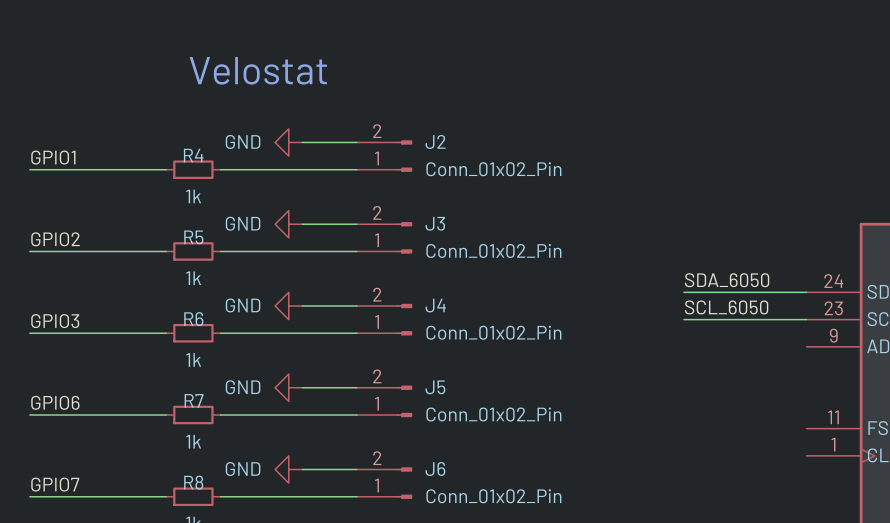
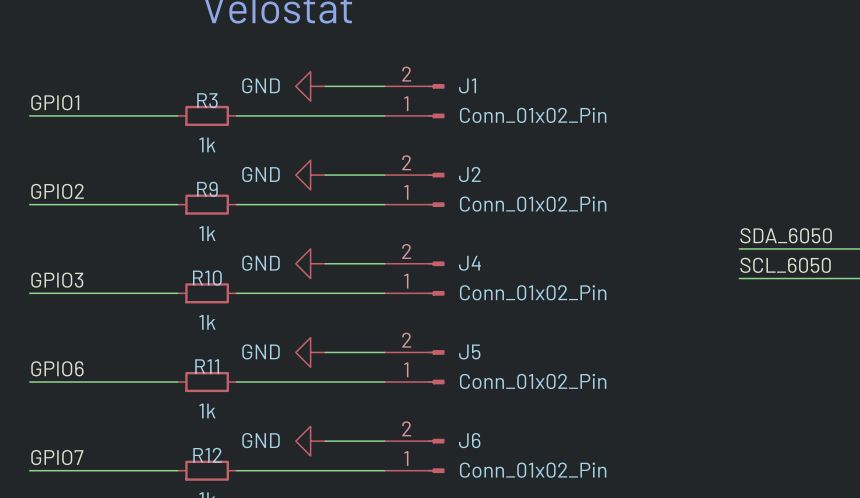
J2 name: J2 (435, 141) -> J1 (467, 85)
R4 name: R4 (193, 155) -> R3 (207, 100)
J3 name: J3 (435, 223) -> J2 (469, 174)
R5 name: R5 (193, 237) -> R9 (207, 189)
R6 name: R6 (193, 319) -> R10 (207, 277)
R7 name: R7 (194, 400) -> R11 (207, 366)
R8 name: R8 (193, 482) -> R12 (207, 455)

